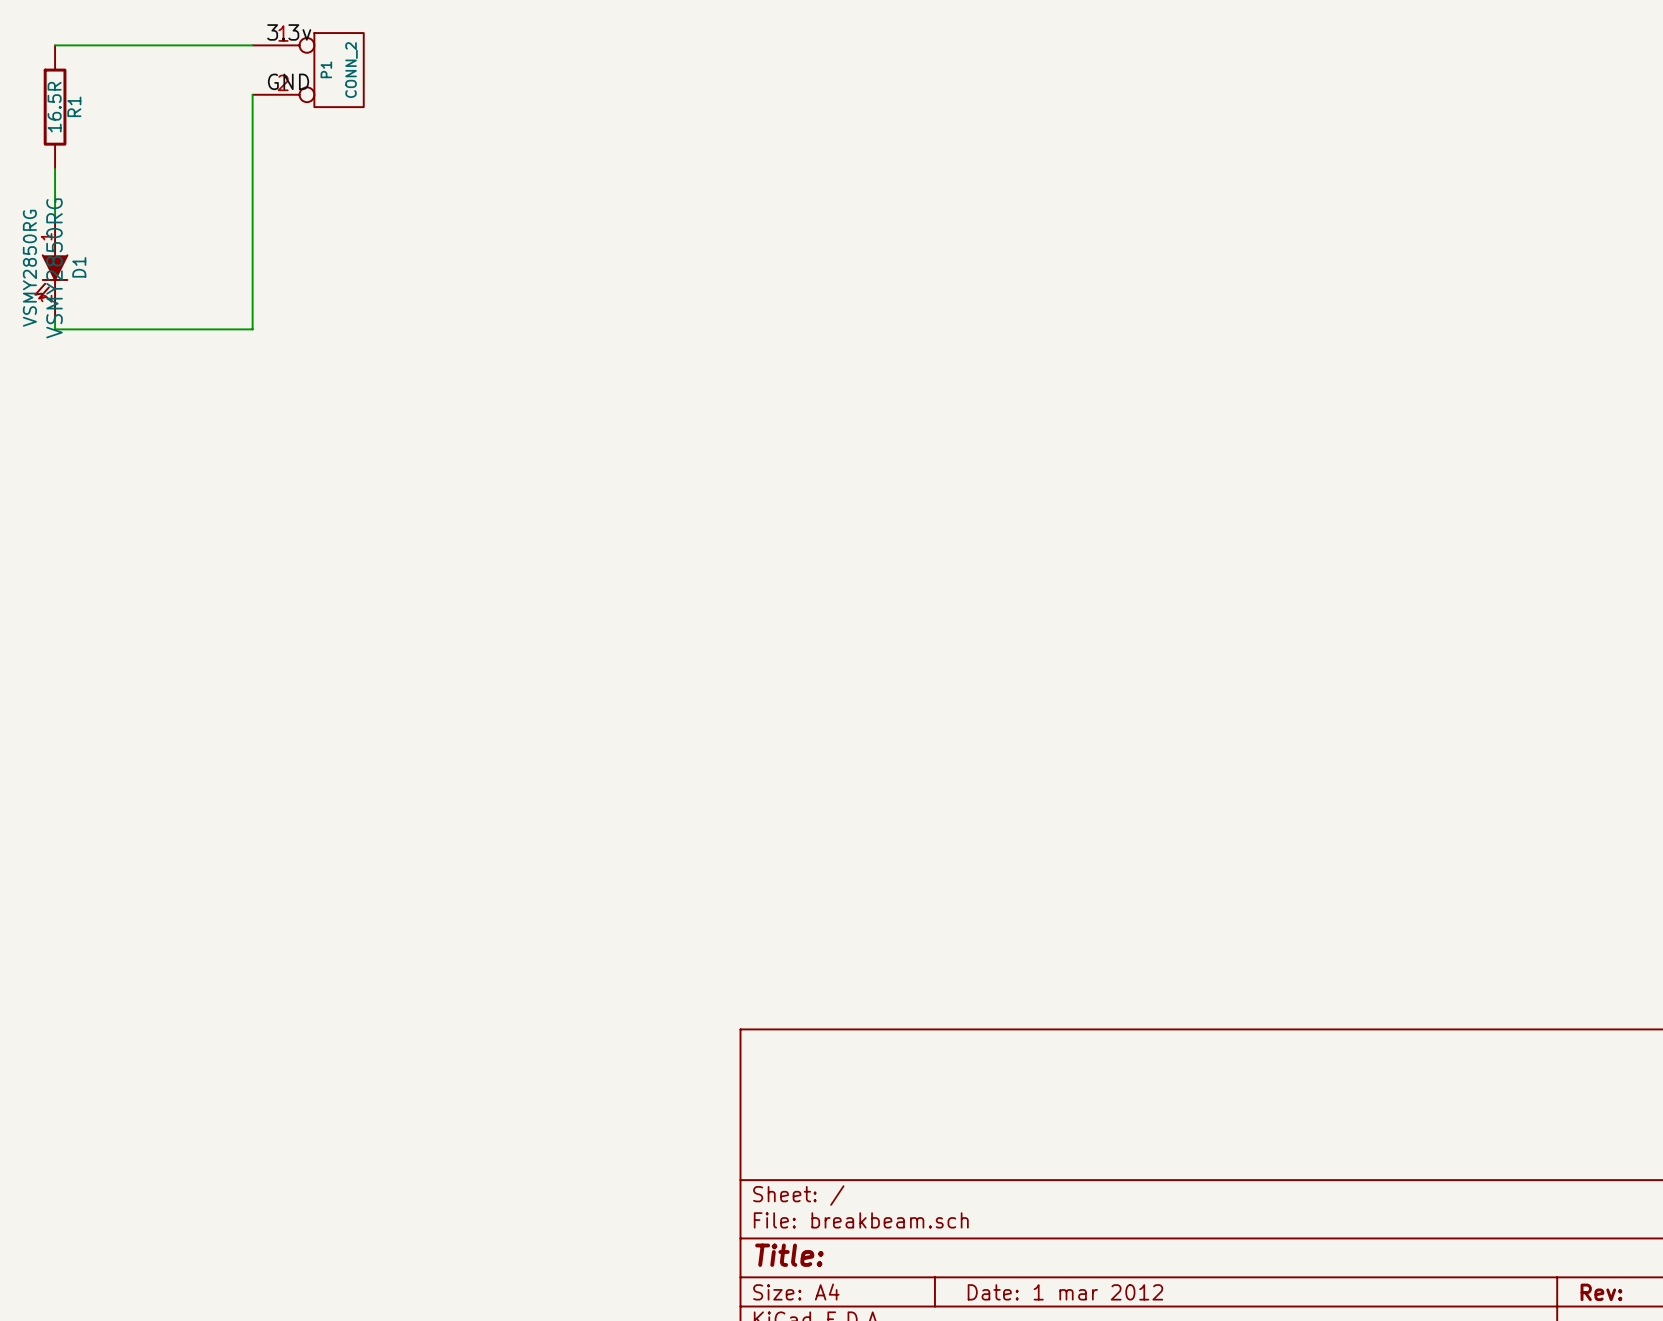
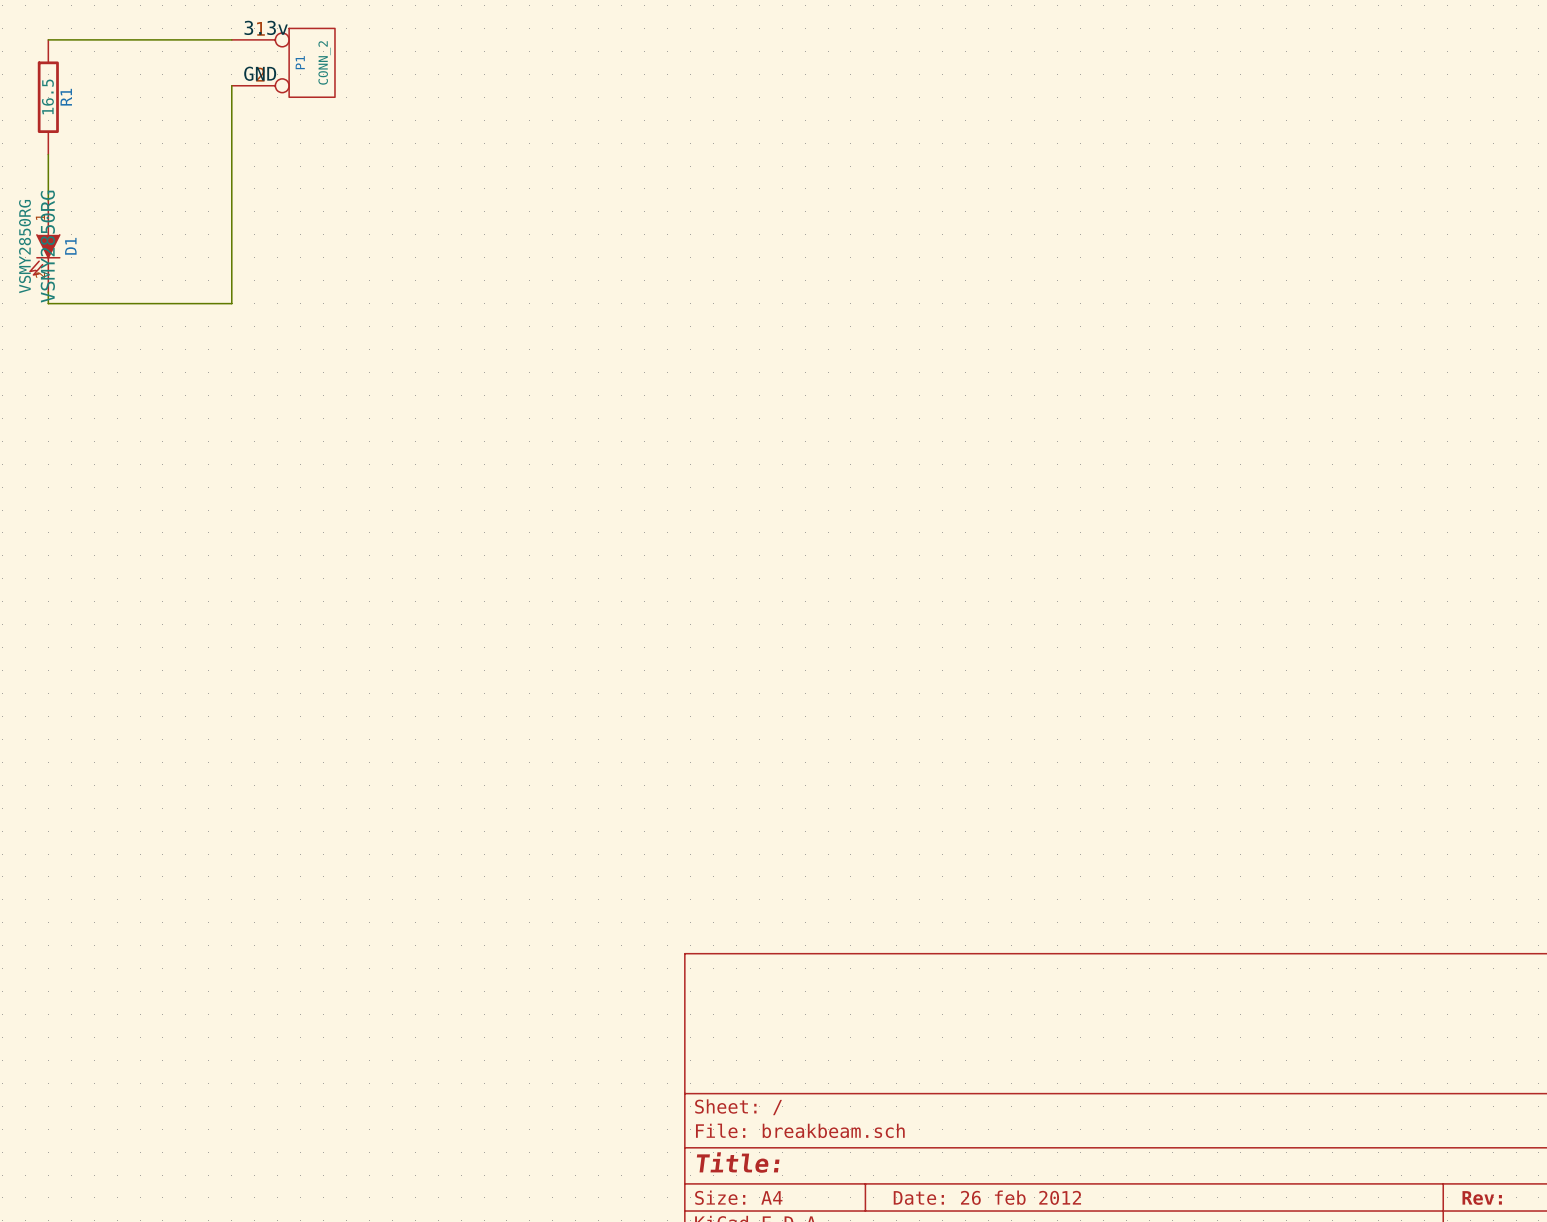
R1 value: 16.5R (54, 107) -> 16.5 (47, 96)
title block: Date: 1 mar 2012 (1065, 1292) -> Date: 26 feb 2012 (987, 1197)

